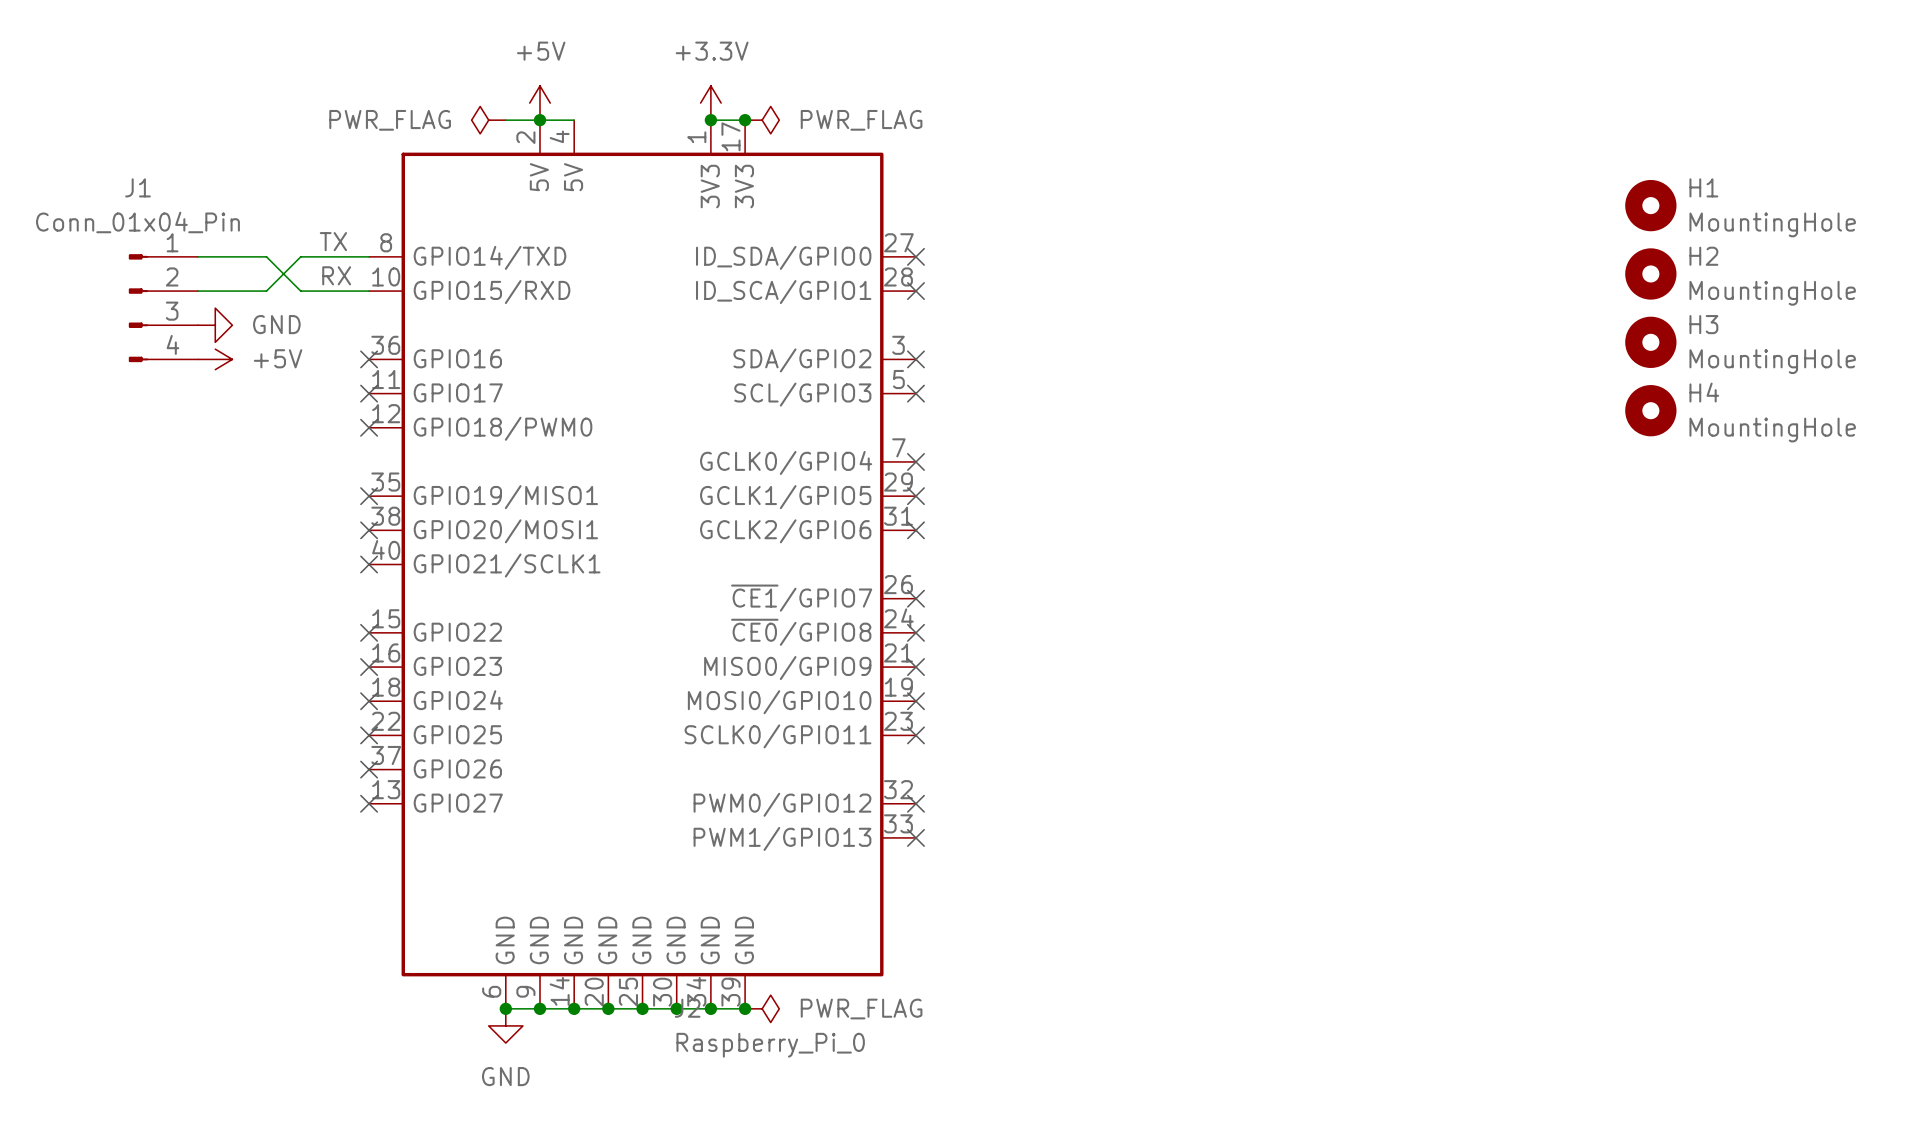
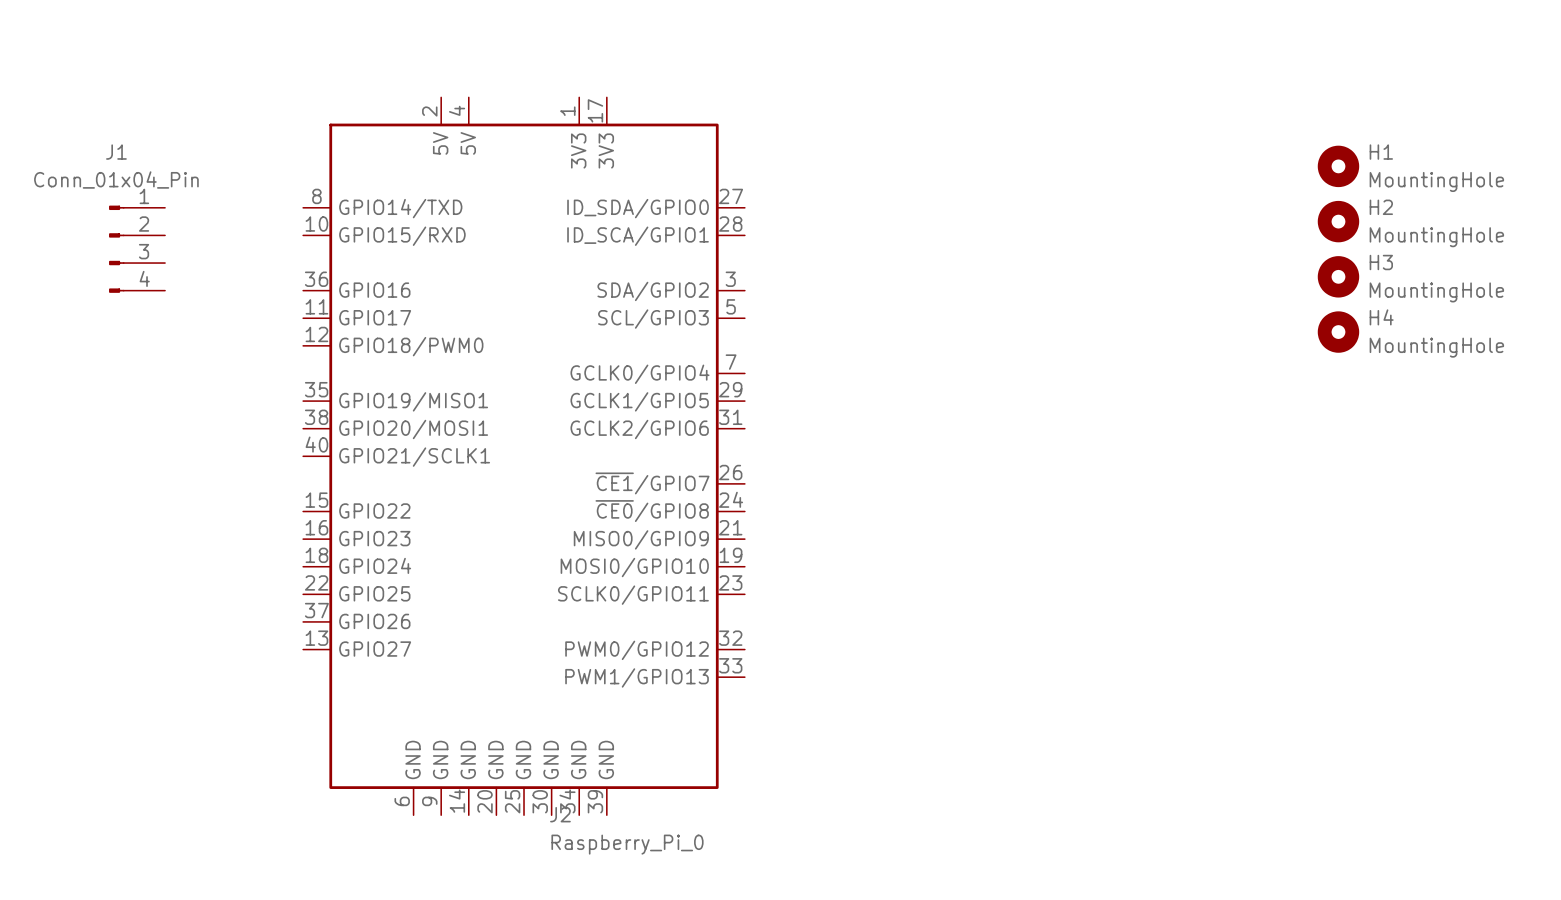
power symbol: +5V (539, 103) -> none
power symbol: +3.3V (710, 103) -> none
power symbol: PWR_FLAG (488, 120) -> none
wire: (505, 120) (574, 120) -> none
junction: (539, 120) -> none
wire: (710, 120) (745, 120) -> none
junction: (710, 120) -> none
junction: (745, 120) -> none
power symbol: PWR_FLAG (762, 120) -> none
label: TX (333, 241) -> none
wire: (198, 256) (266, 256) (300, 291) (369, 291) -> none
wire: (369, 256) (300, 256) (266, 291) (198, 291) -> none
no-connect mark: (915, 256) -> none
label: RX (336, 275) -> none
no-connect mark: (915, 291) -> none
power symbol: GND (215, 325) -> none
power symbol: +5V (215, 359) -> none
no-connect mark: (369, 359) -> none
no-connect mark: (915, 359) -> none
no-connect mark: (369, 393) -> none
no-connect mark: (915, 393) -> none
no-connect mark: (369, 427) -> none
no-connect mark: (915, 461) -> none
no-connect mark: (369, 496) -> none
no-connect mark: (915, 496) -> none
no-connect mark: (369, 530) -> none
no-connect mark: (915, 530) -> none
no-connect mark: (369, 564) -> none
no-connect mark: (915, 598) -> none
no-connect mark: (369, 632) -> none
no-connect mark: (915, 632) -> none
no-connect mark: (369, 667) -> none
no-connect mark: (915, 667) -> none
no-connect mark: (369, 701) -> none
no-connect mark: (915, 701) -> none
no-connect mark: (369, 735) -> none
no-connect mark: (915, 735) -> none
no-connect mark: (369, 769) -> none
no-connect mark: (369, 803) -> none
no-connect mark: (915, 803) -> none
no-connect mark: (915, 837) -> none
wire: (505, 1008) (745, 1008) -> none
junction: (505, 1008) -> none
junction: (539, 1008) -> none
junction: (574, 1008) -> none
junction: (608, 1008) -> none
junction: (642, 1008) -> none
junction: (676, 1008) -> none
junction: (710, 1008) -> none
junction: (745, 1008) -> none
power symbol: PWR_FLAG (762, 1008) -> none
power symbol: GND (505, 1025) -> none

